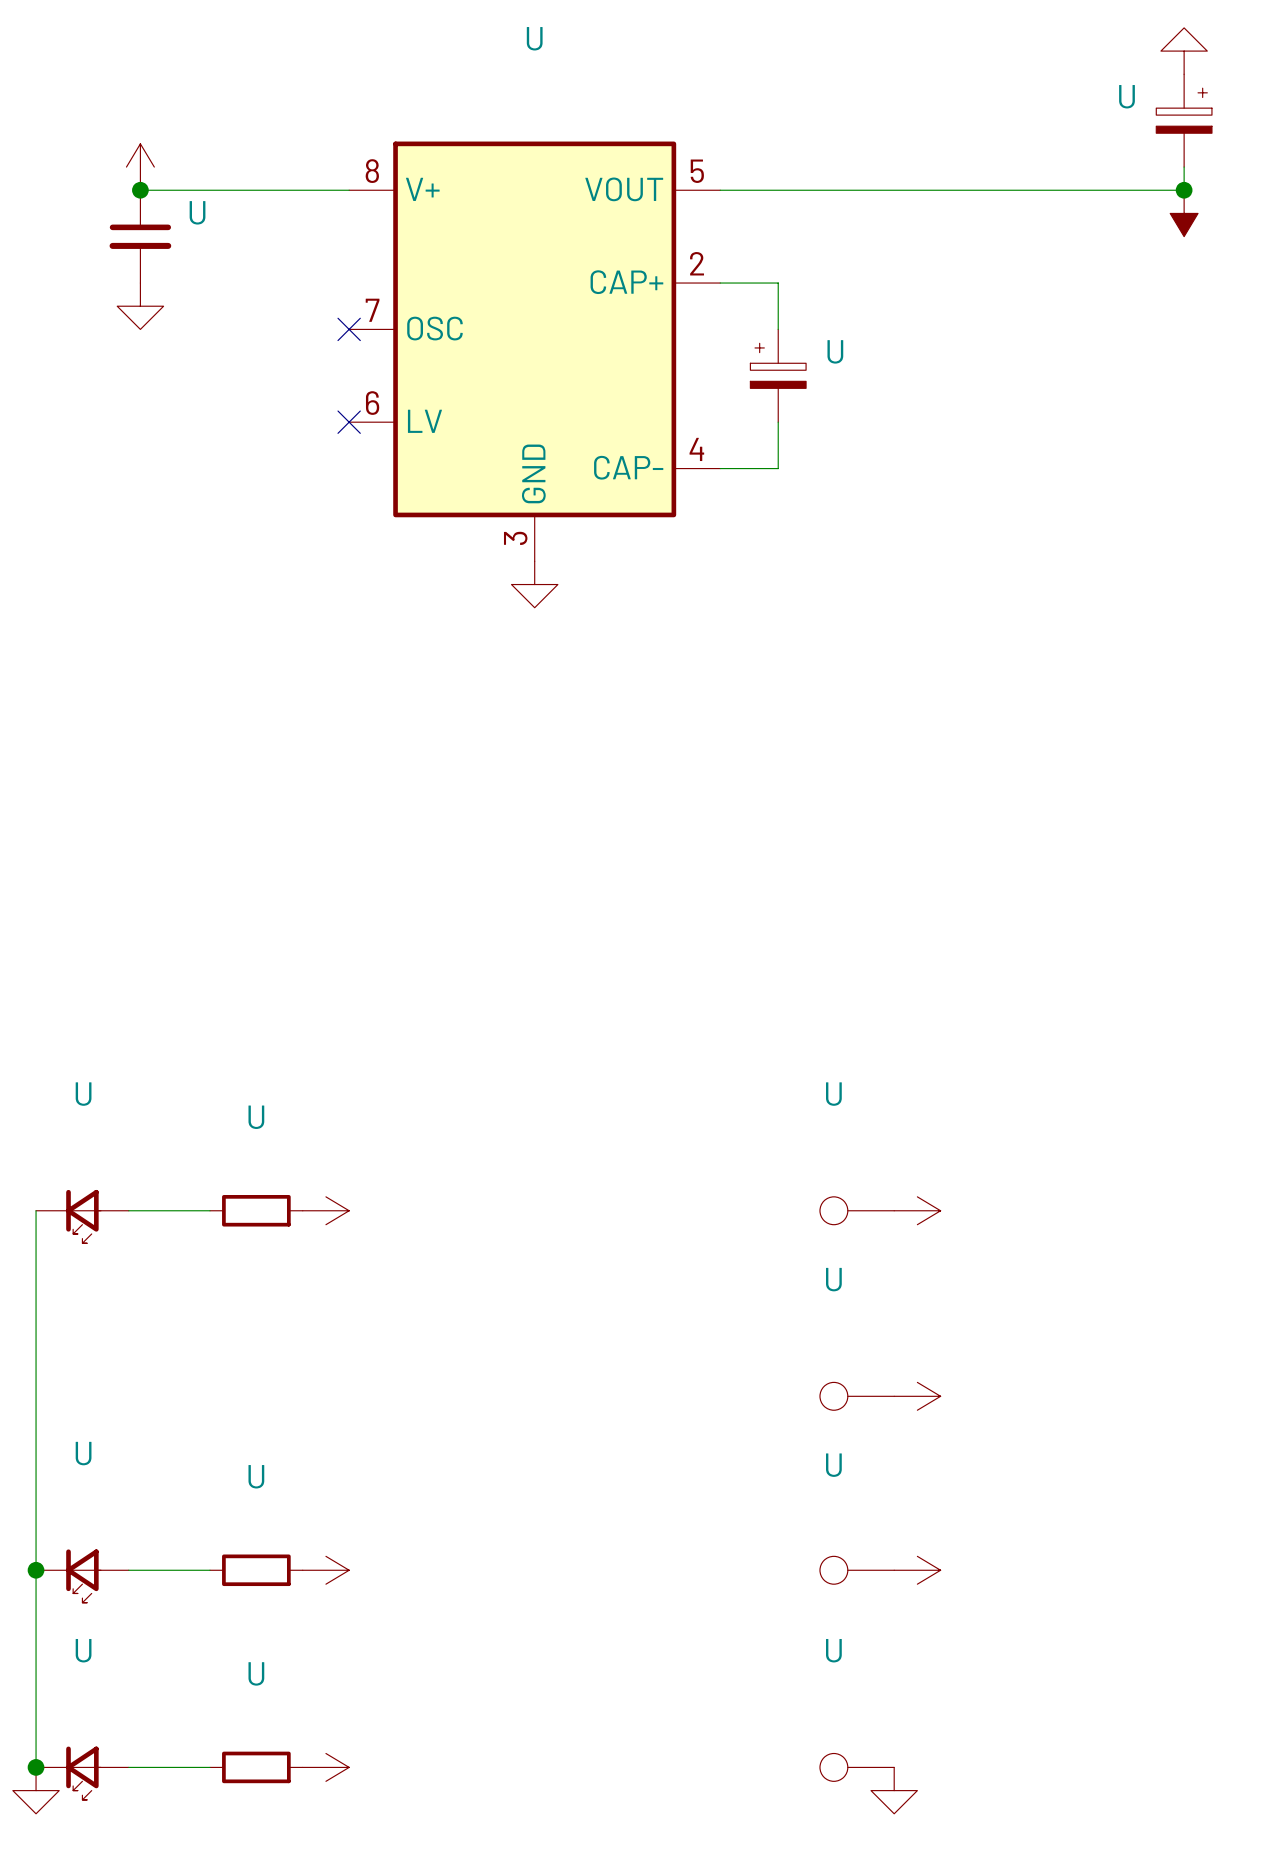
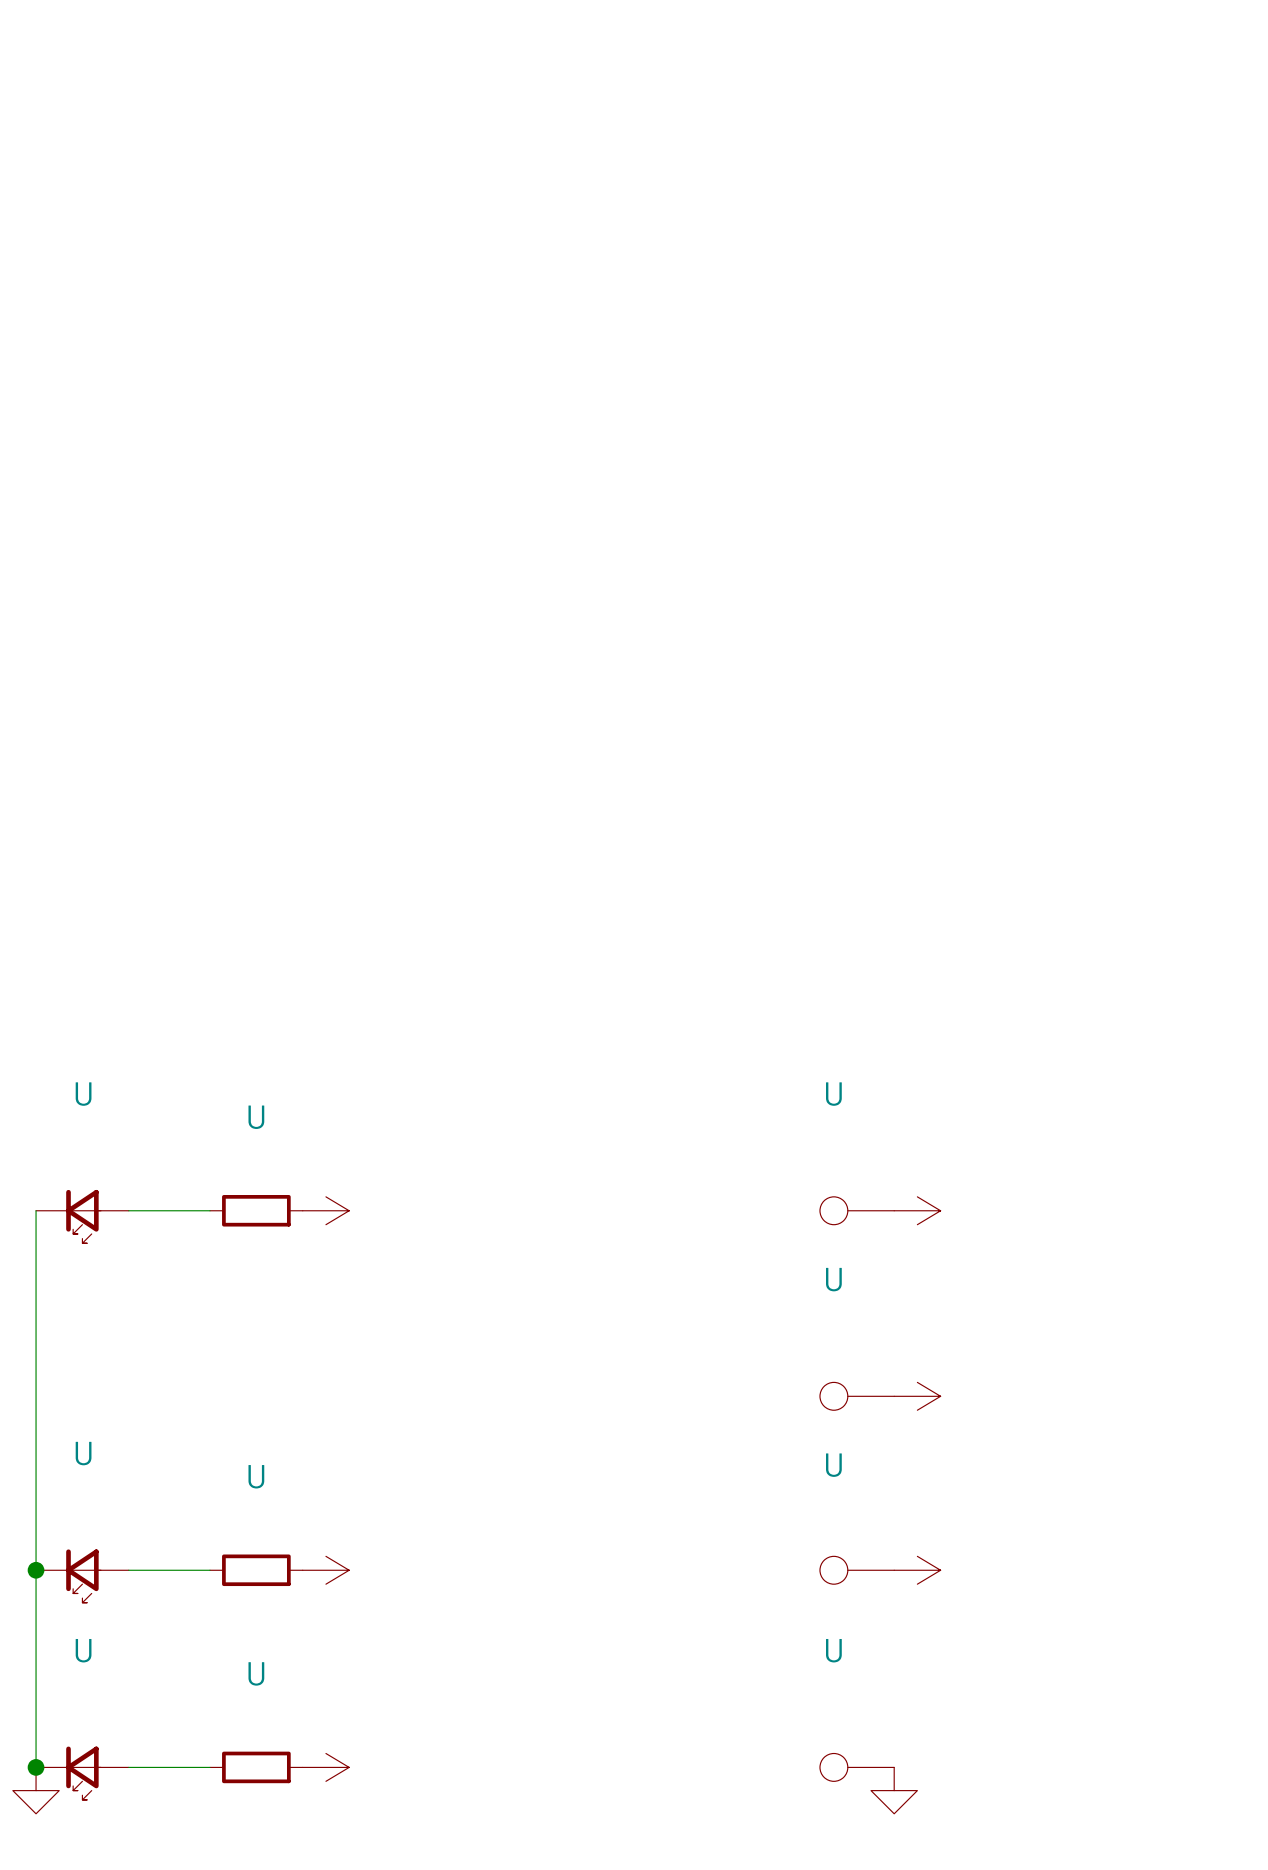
power symbol: (1184, 51) -> none
U: (1184, 120) -> none
power symbol: (140, 167) -> none
wire: (1184, 167) (1184, 190) (720, 190) -> none
wire: (140, 190) (349, 190) -> none
junction: (140, 190) -> none
junction: (1184, 190) -> none
power symbol: (1184, 213) -> none
U: (140, 236) -> none
wire: (720, 283) (778, 283) (778, 329) -> none
power symbol: (140, 306) -> none
no-connect mark: (349, 329) -> none
U: (534, 351) -> none
U: (778, 375) -> none
no-connect mark: (349, 422) -> none
wire: (778, 422) (778, 468) (720, 468) -> none
power symbol: (534, 584) -> none

